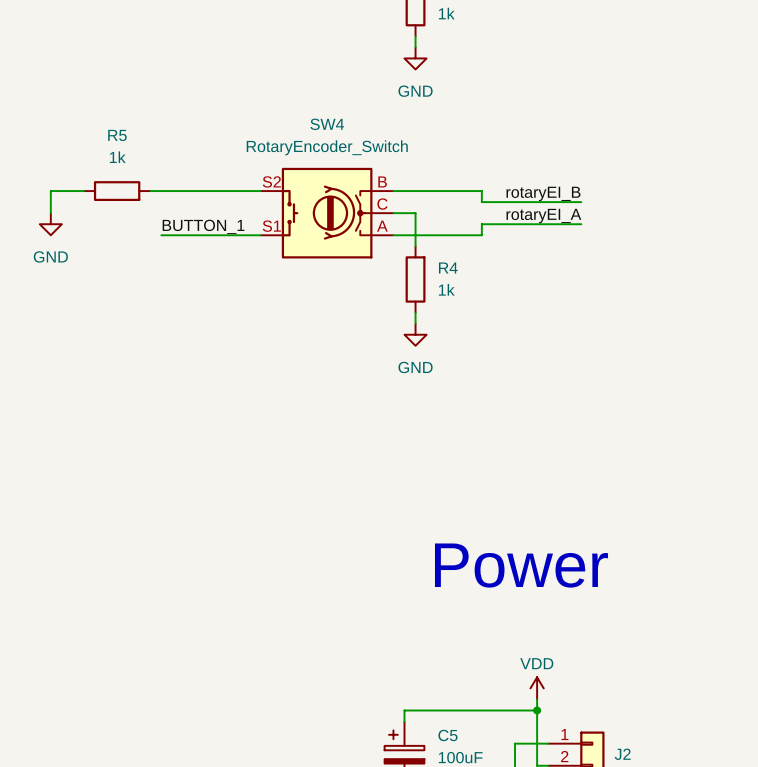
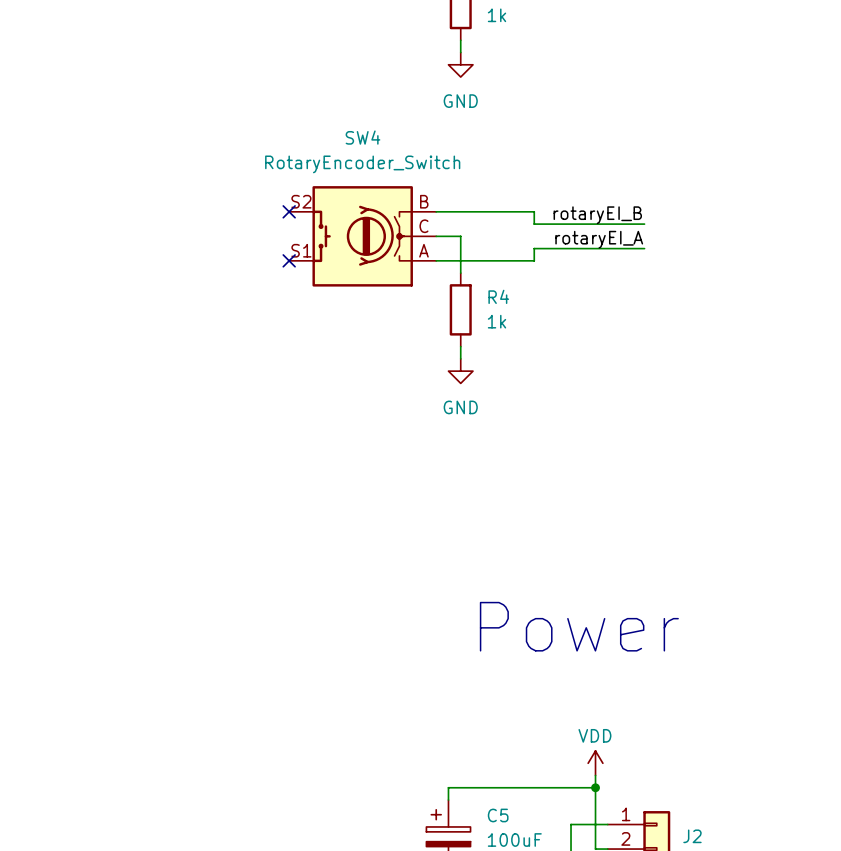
wire: (83, 191) (50, 191) (50, 213) -> none
R5: 1k (117, 191) -> none
wire: (150, 191) (260, 191) -> none
no-connect mark: none -> (289, 211)
power symbol: GND (50, 224) -> none
label: BUTTON_1 (203, 226) -> none
wire: (161, 235) (260, 235) -> none
no-connect mark: none -> (289, 260)

